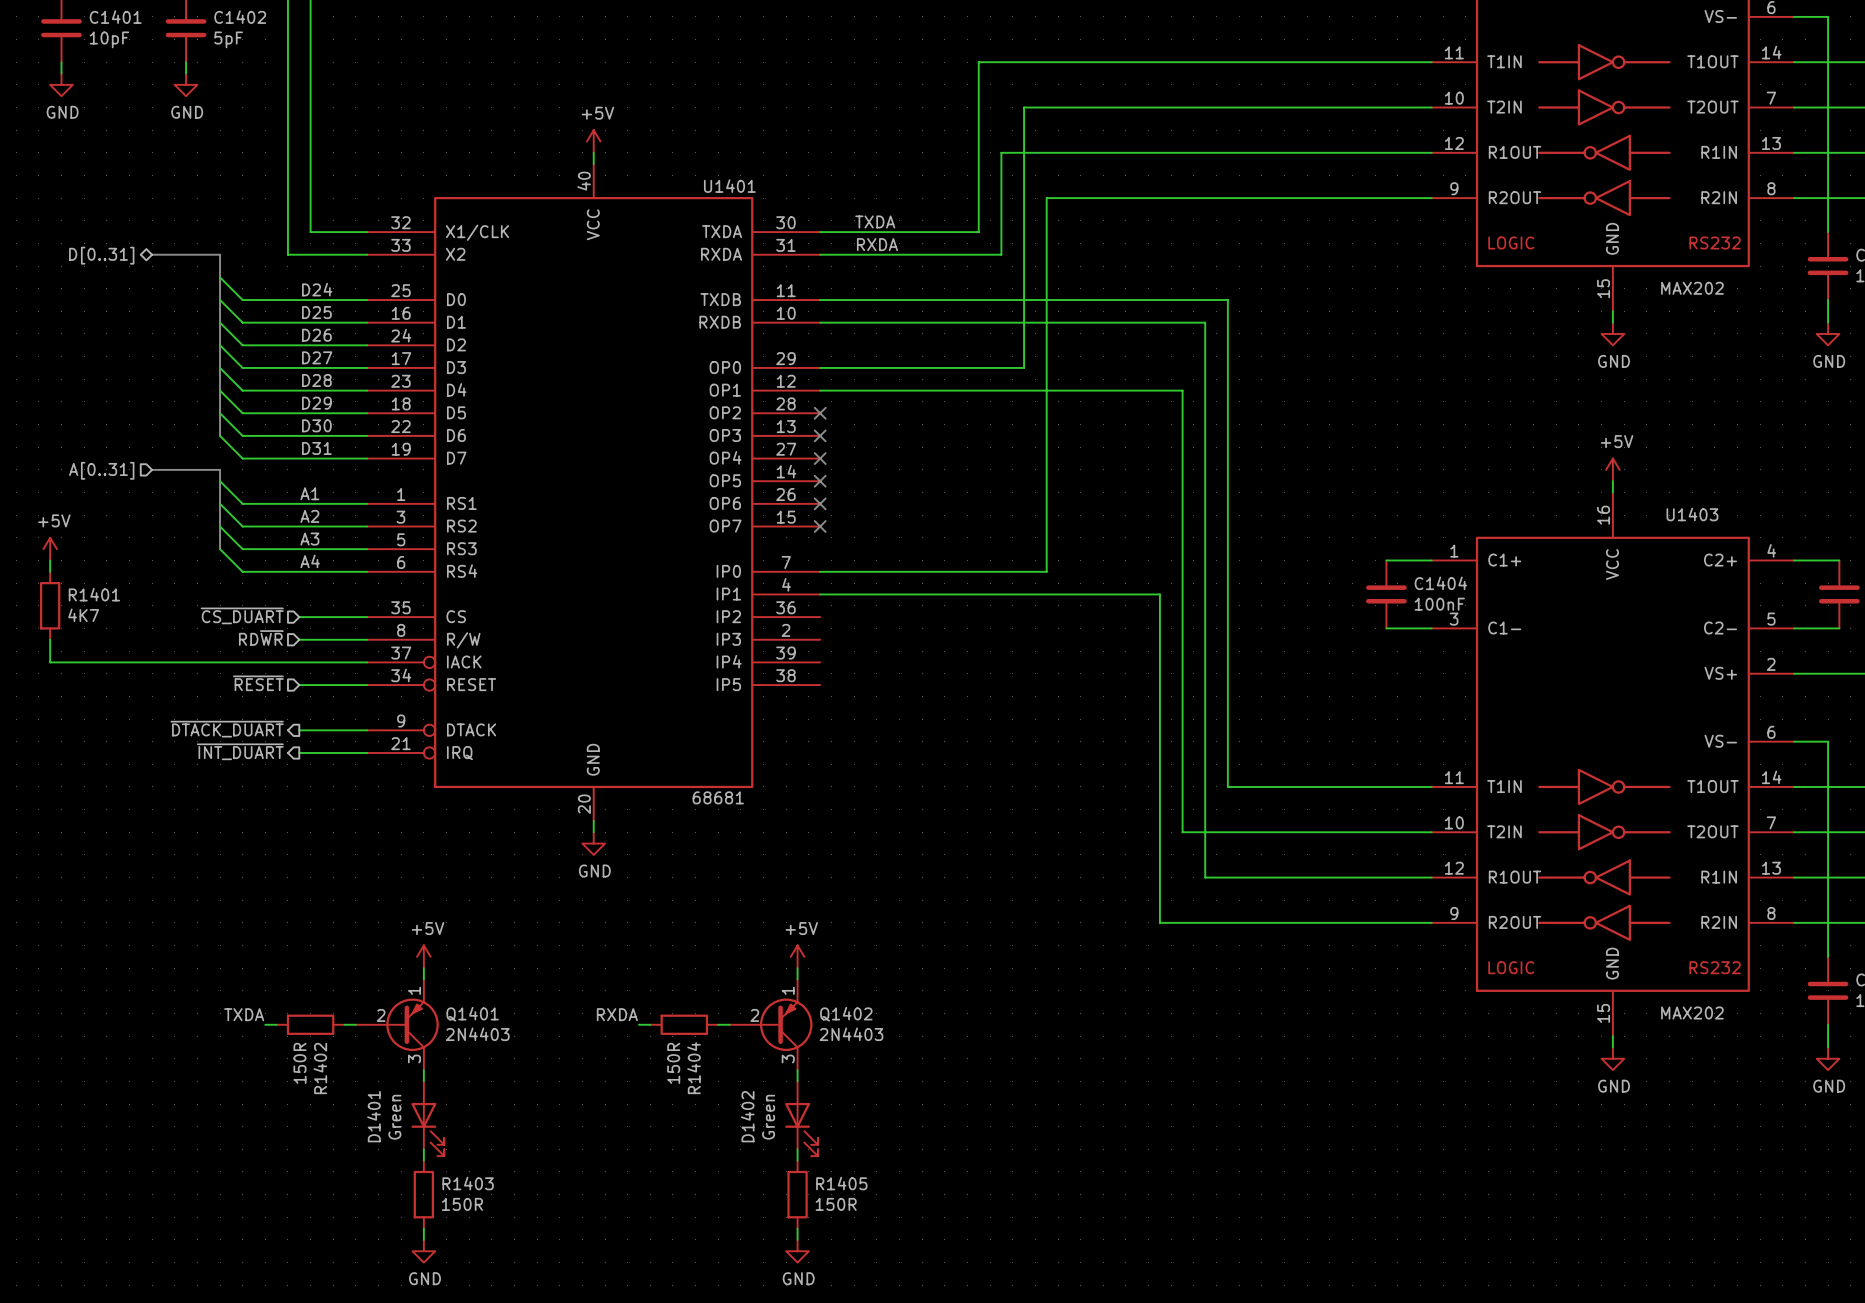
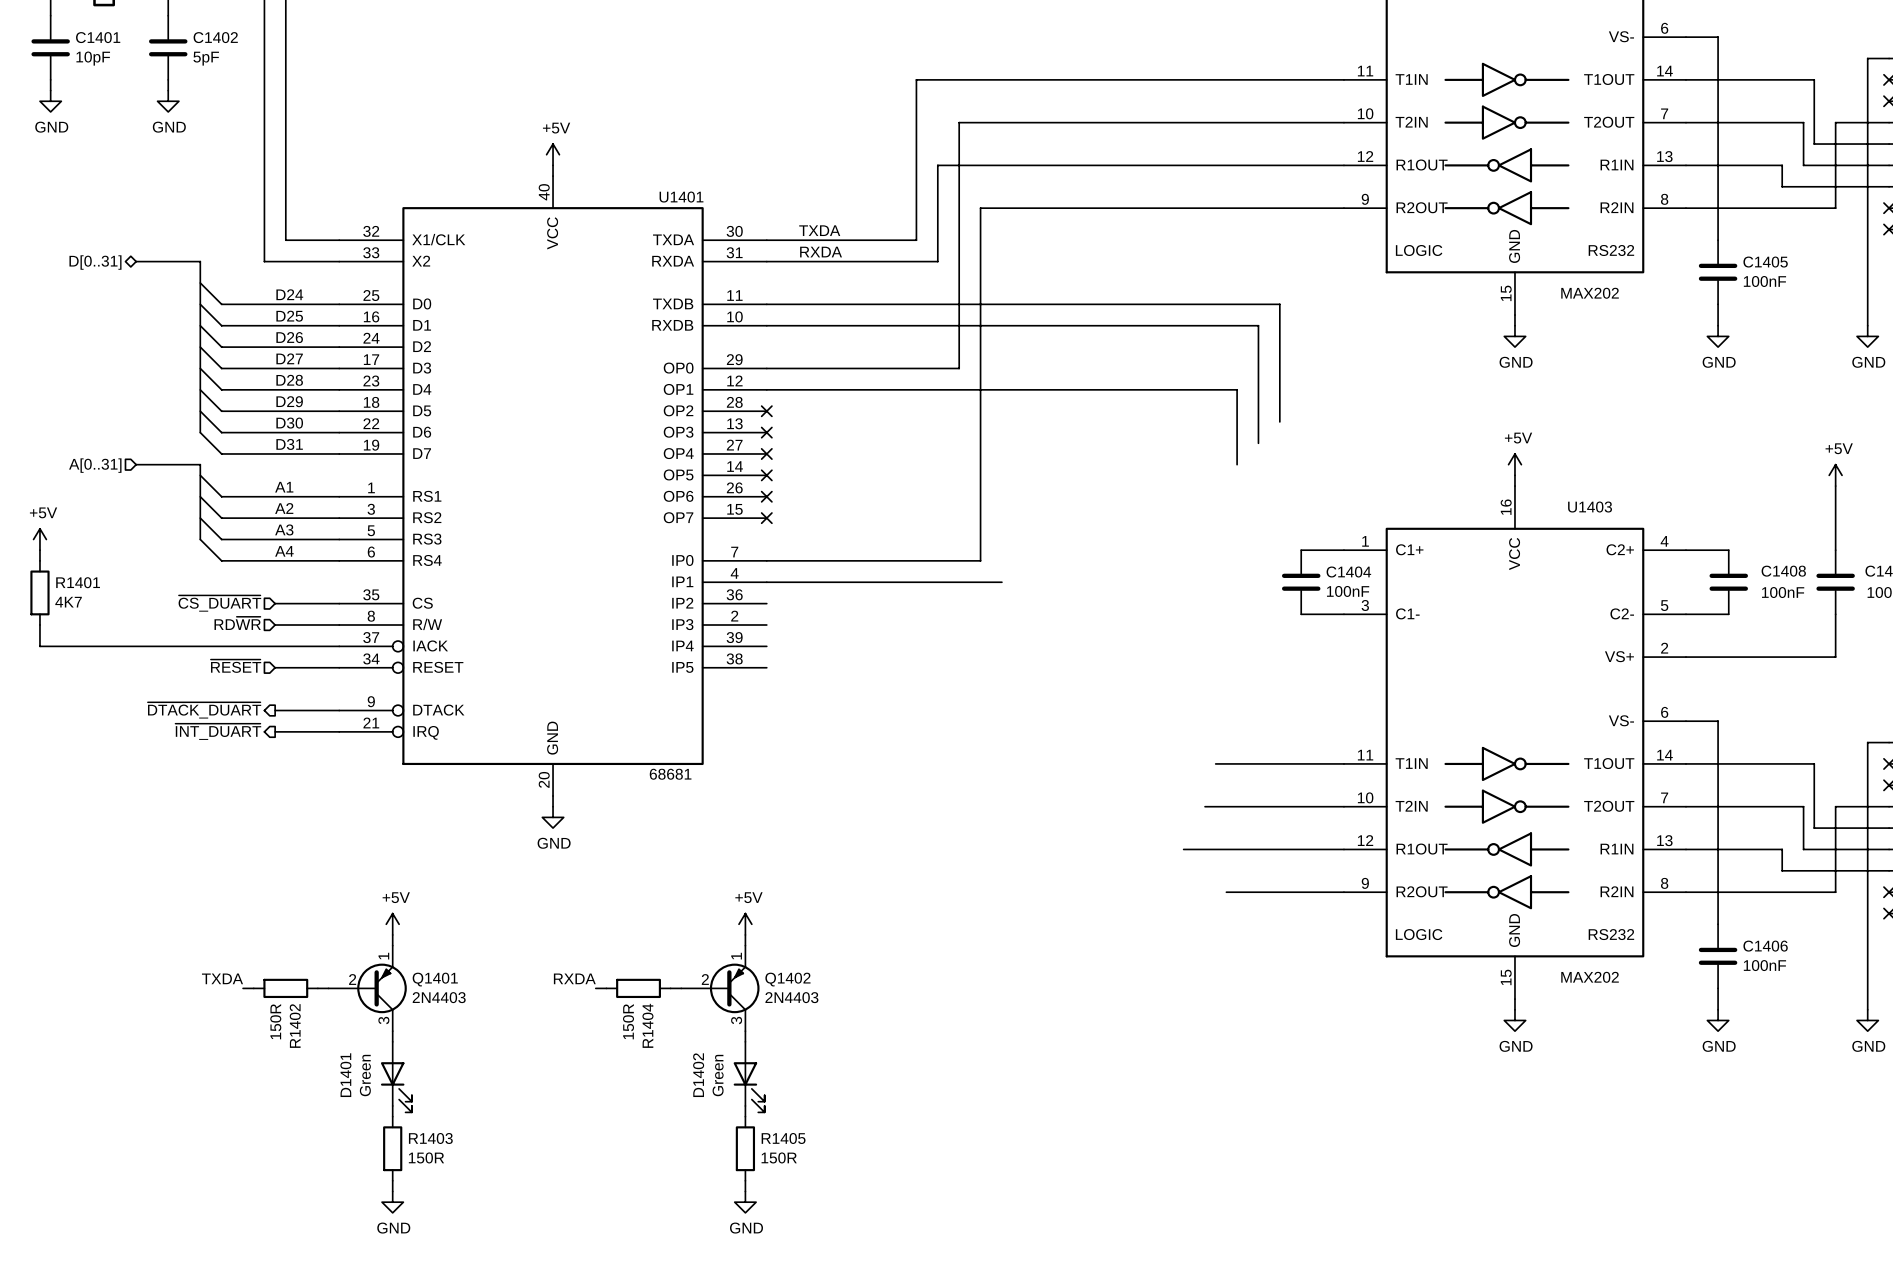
wire: (1227, 300) (1227, 786) (1295, 786) -> (1151, 304) (1279, 304) (1279, 421)
wire: (1205, 322) (1205, 877) (1261, 877) -> (1130, 325) (1258, 325) (1258, 443)
wire: (1182, 390) (1182, 832) (1284, 832) -> (1108, 389) (1237, 389) (1237, 464)
wire: (1069, 594) (1159, 594) (1159, 922) (1307, 922) -> none

